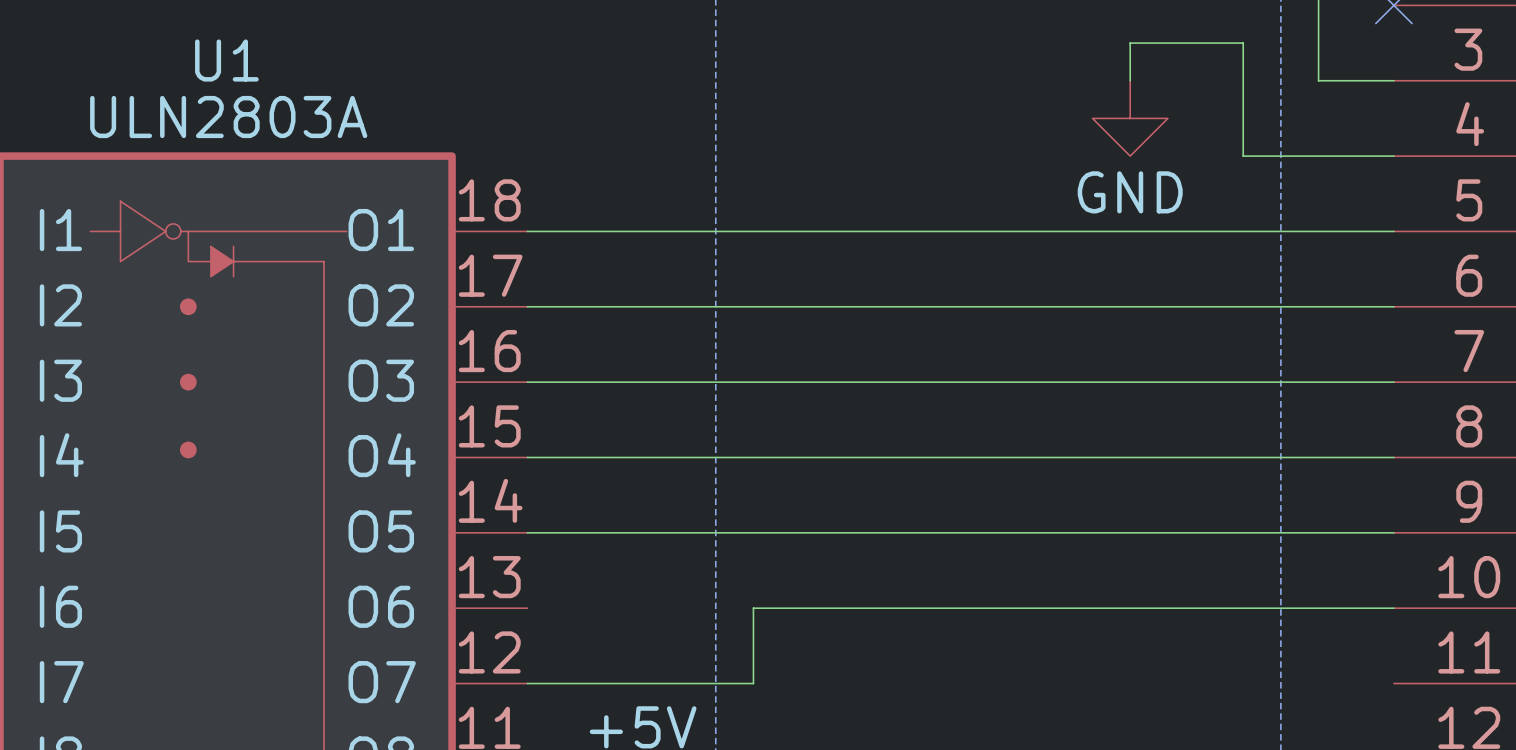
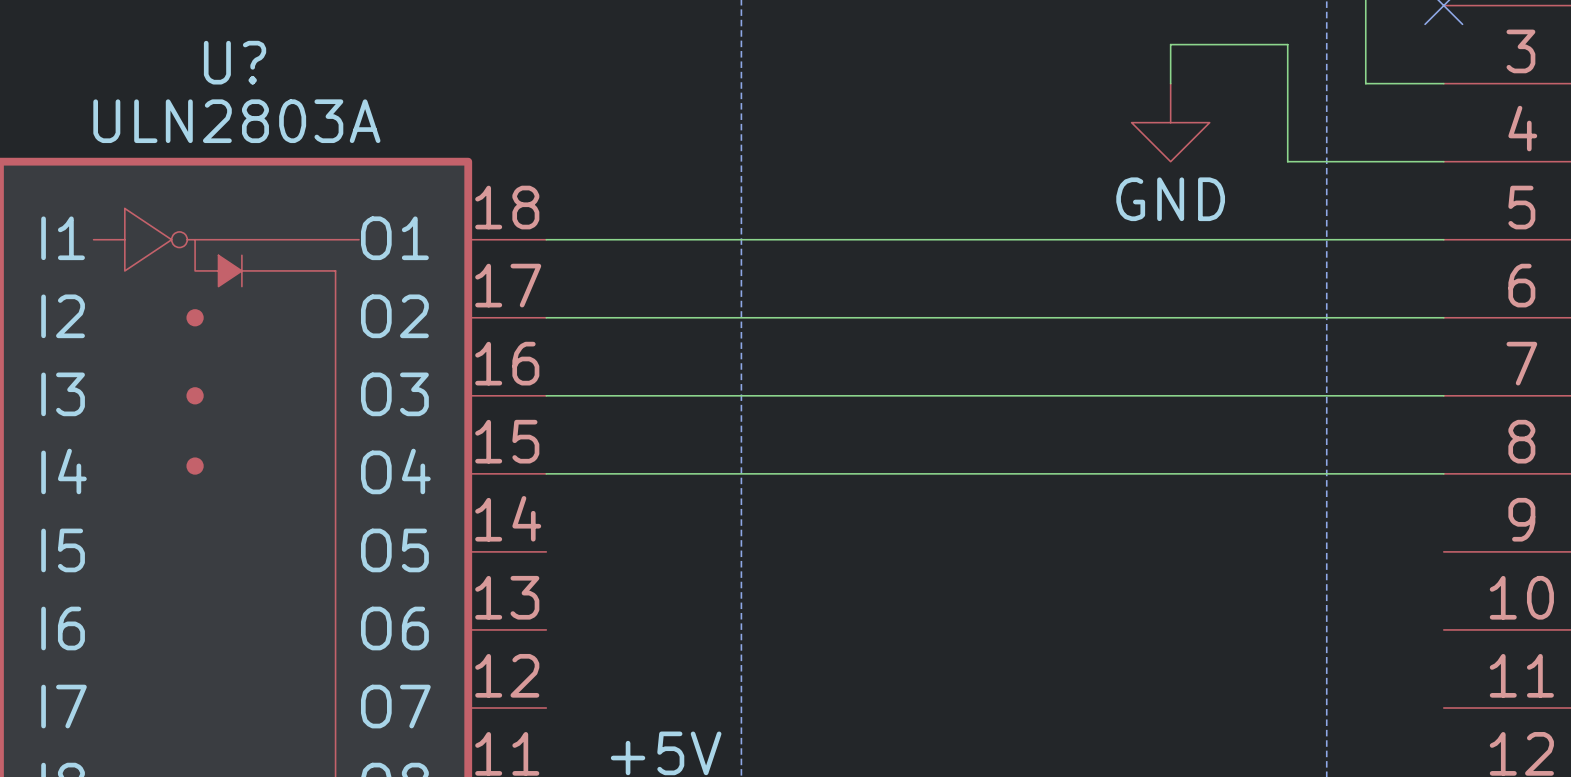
U1 name: U1 (226, 60) -> U? (235, 62)
wire: (527, 532) (1393, 532) -> none
wire: (1393, 608) (753, 608) (753, 683) (527, 683) -> none

